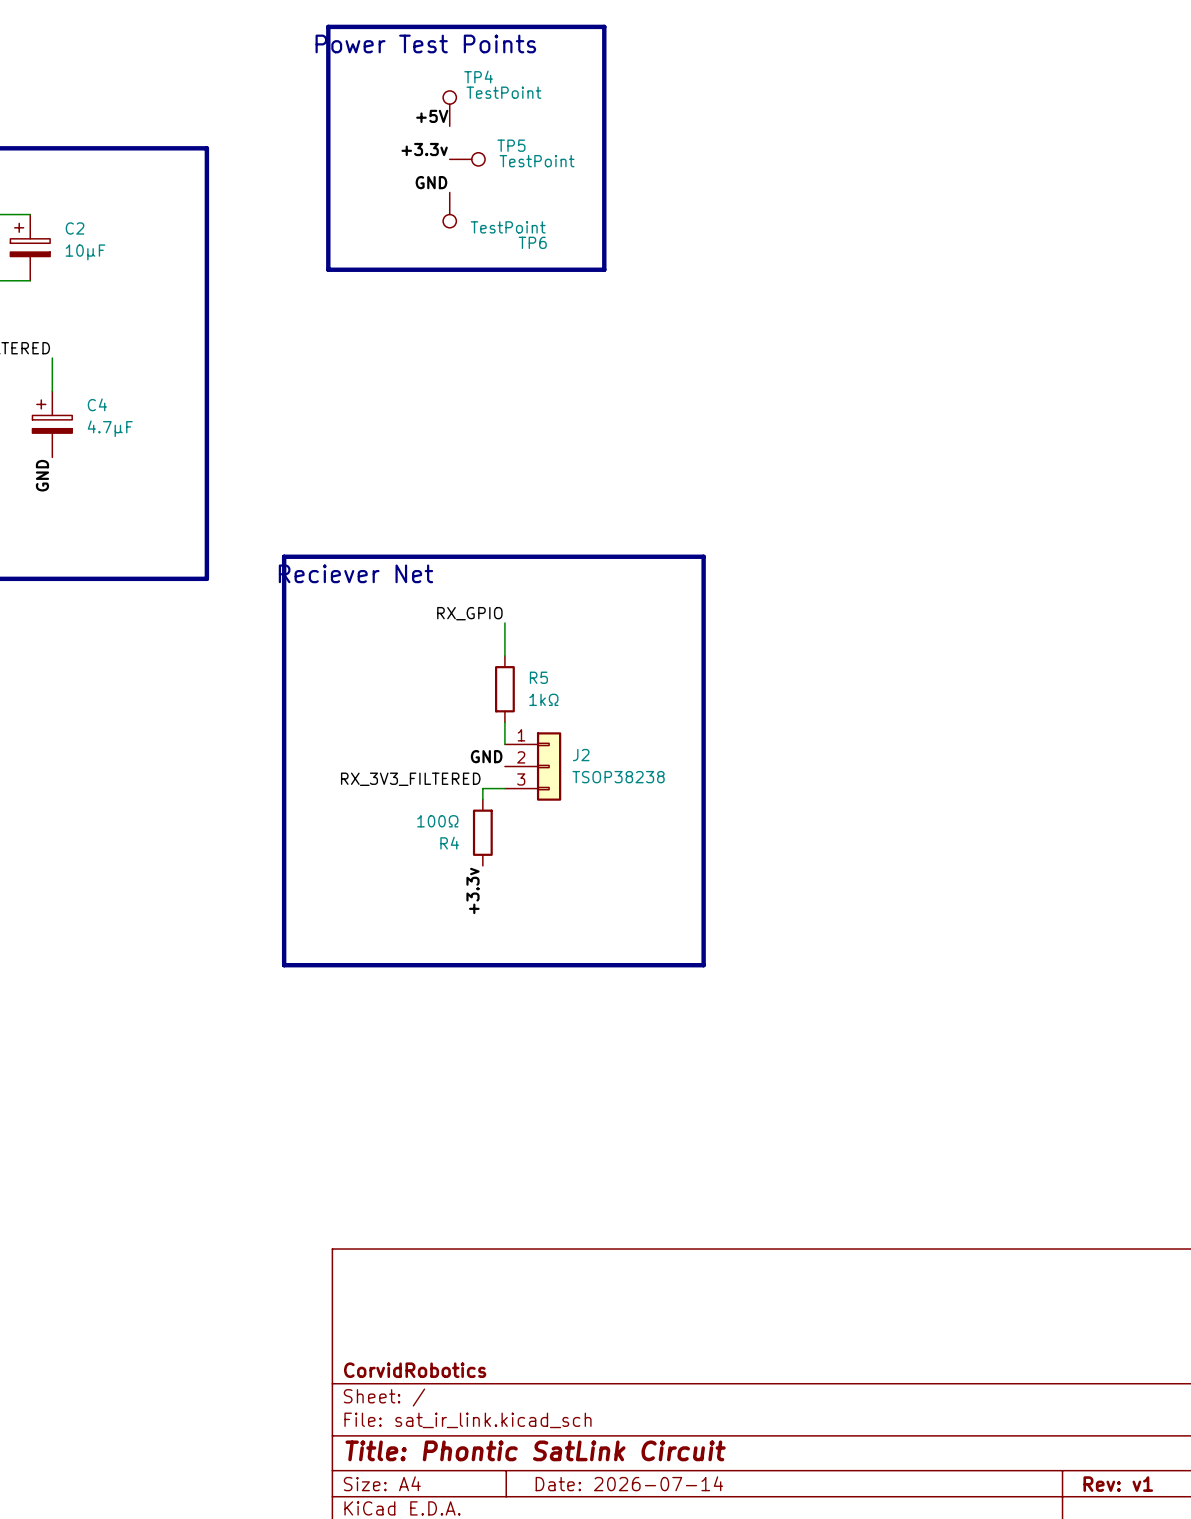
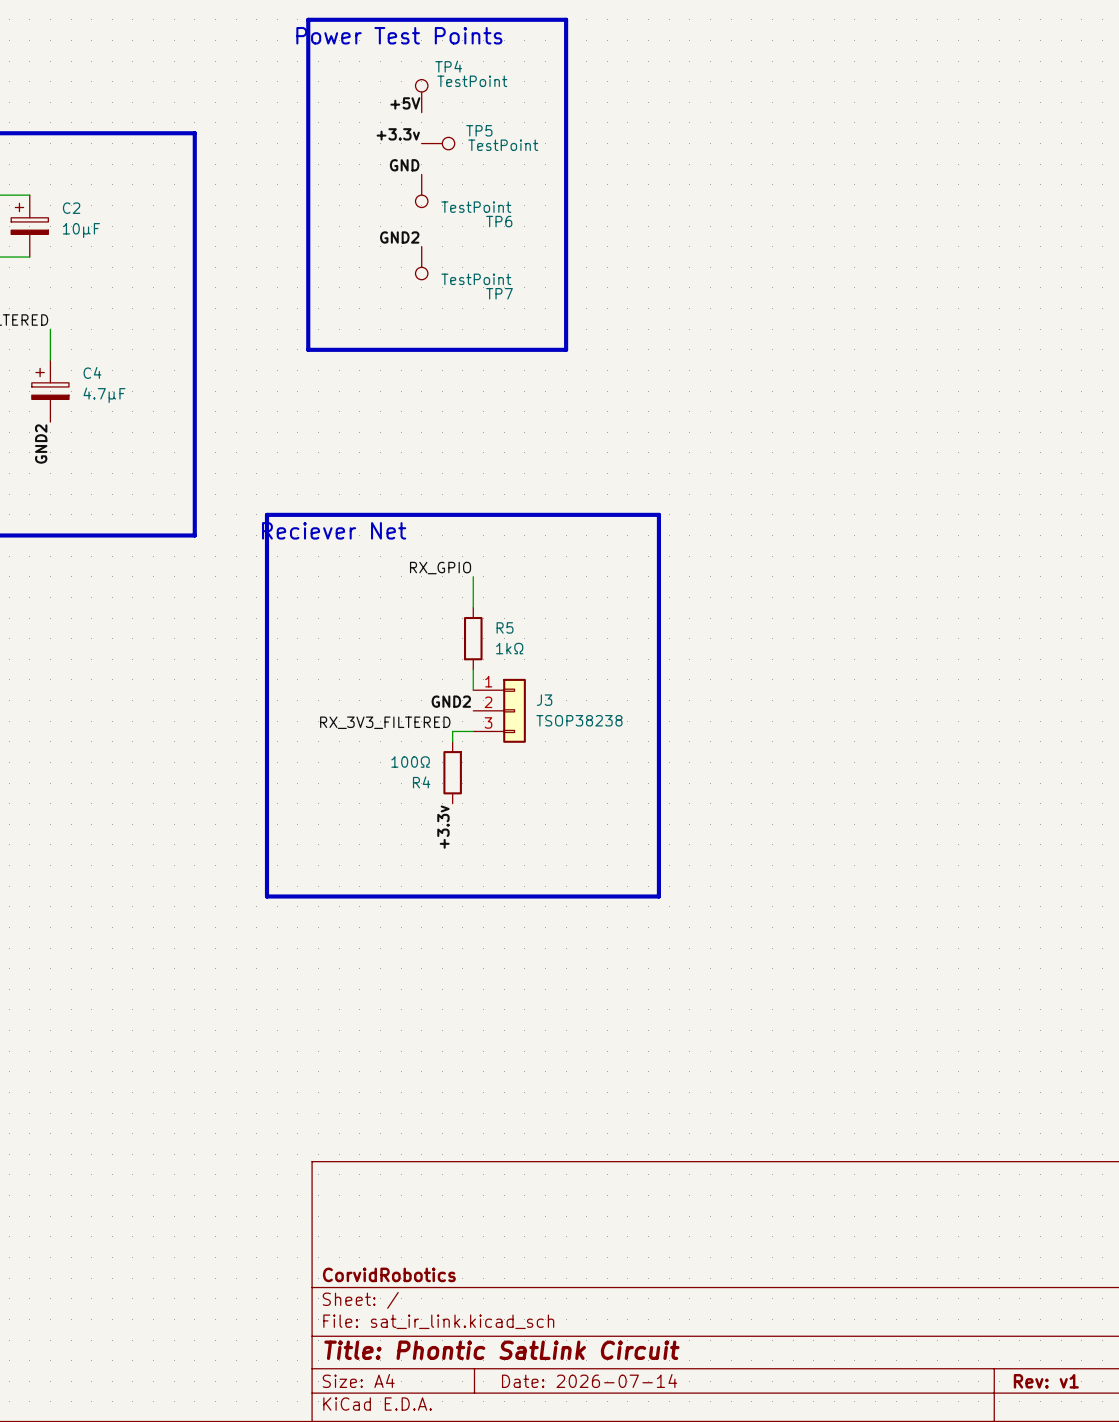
label: none -> GND2 (399, 237)
line: (328, 269) (604, 269) -> (308, 246) (308, 349) (566, 349) (566, 246)
TP7: none -> TestPoint (421, 263)
label: GND (42, 475) -> GND2 (41, 444)
J2 name: J2 (581, 755) -> J3 (544, 700)
label: GND (486, 756) -> GND2 (451, 701)

